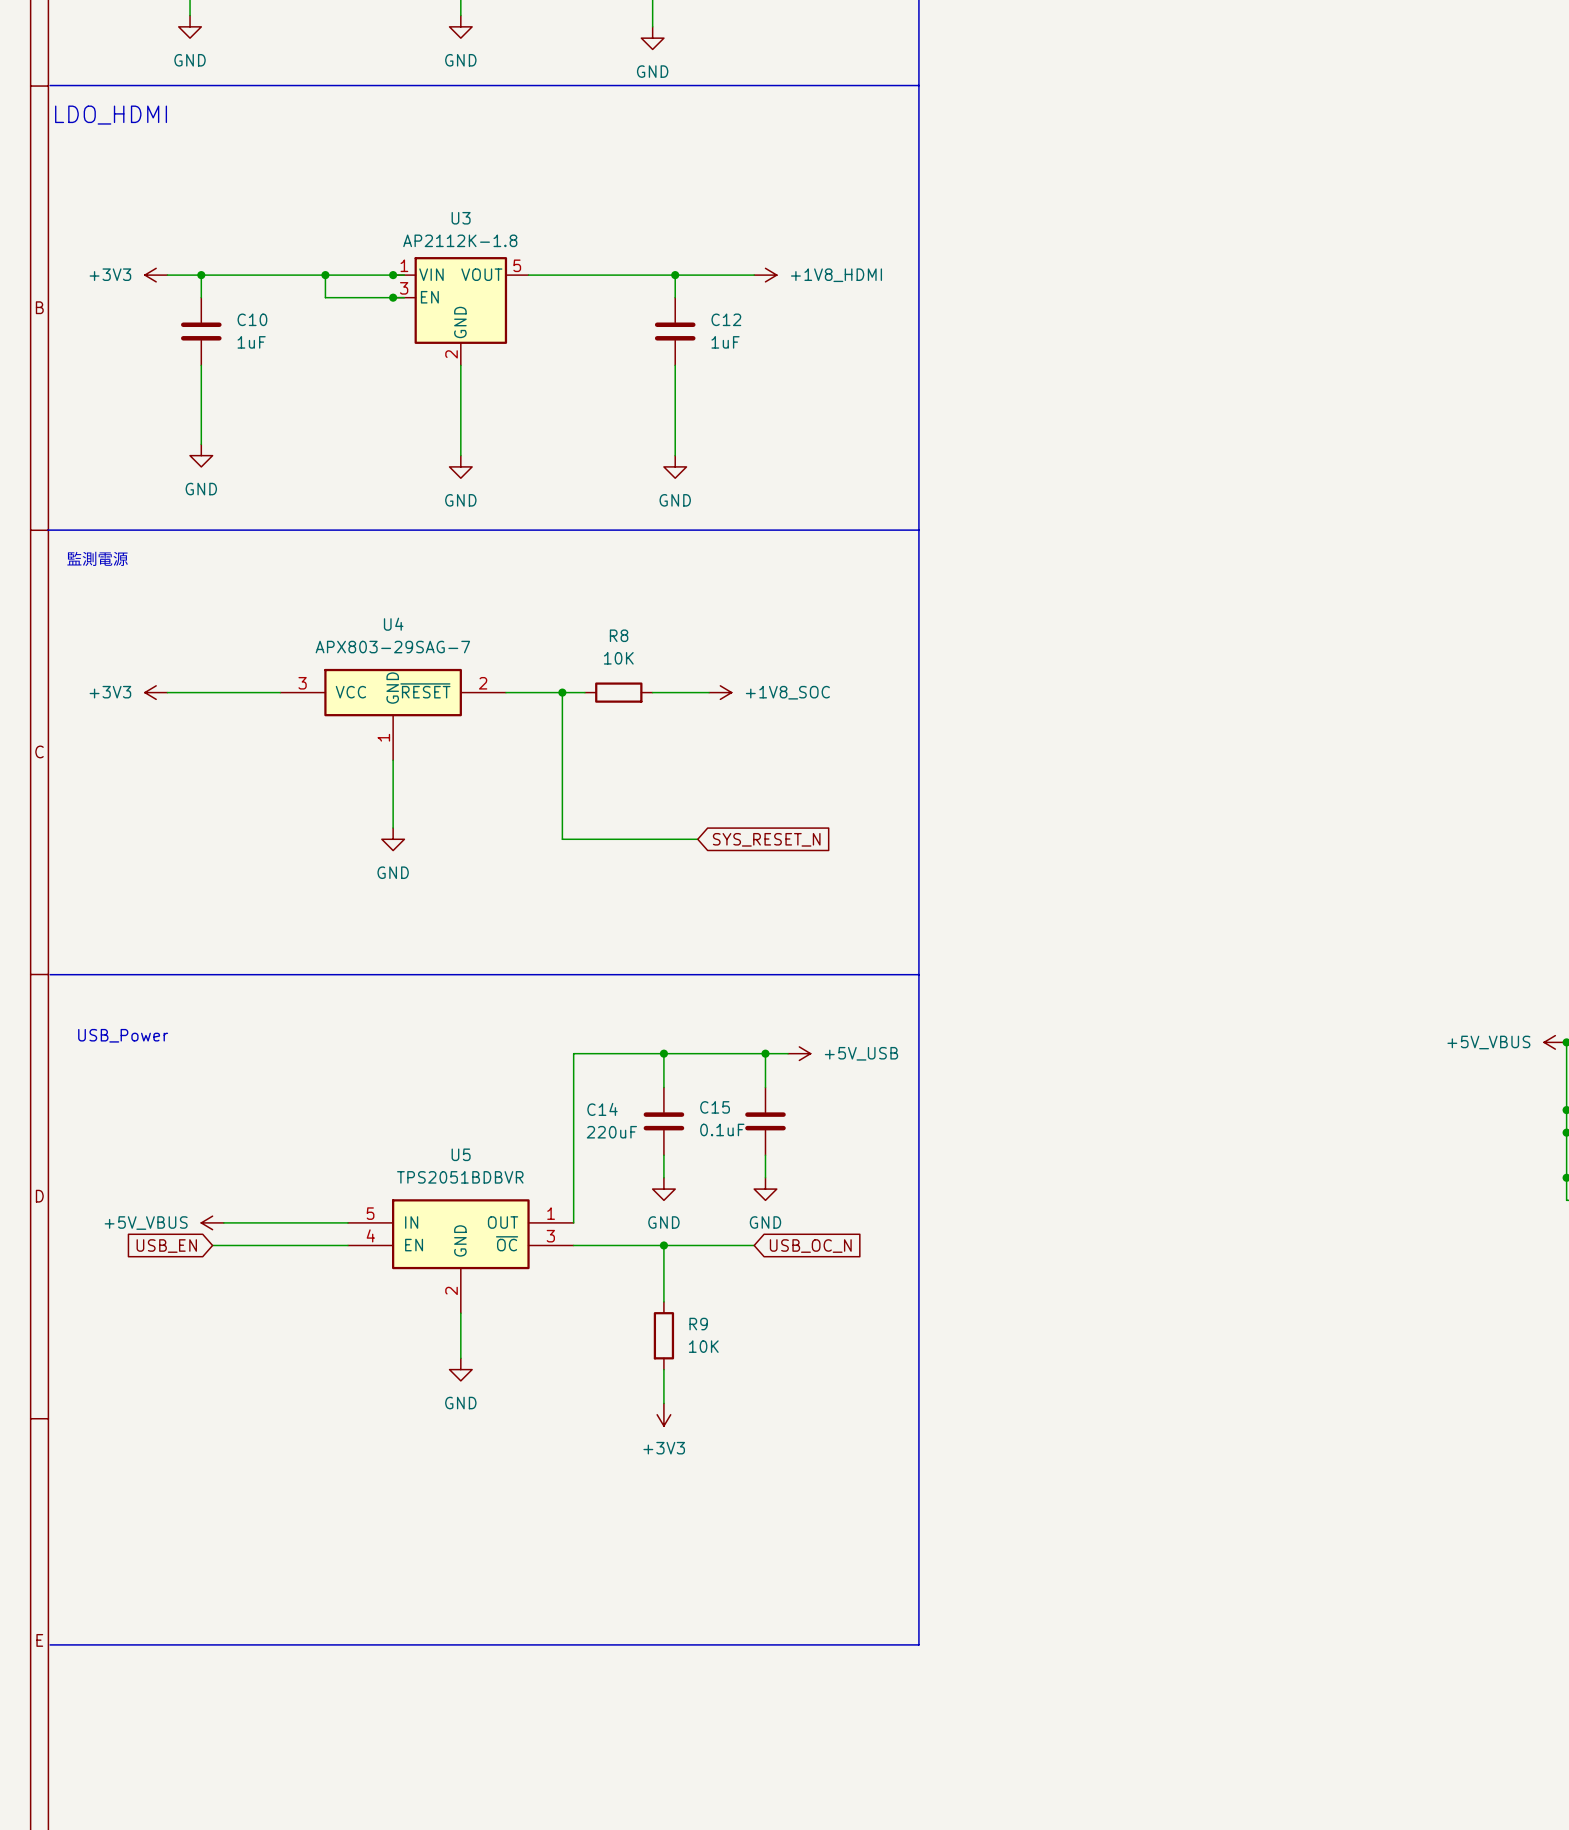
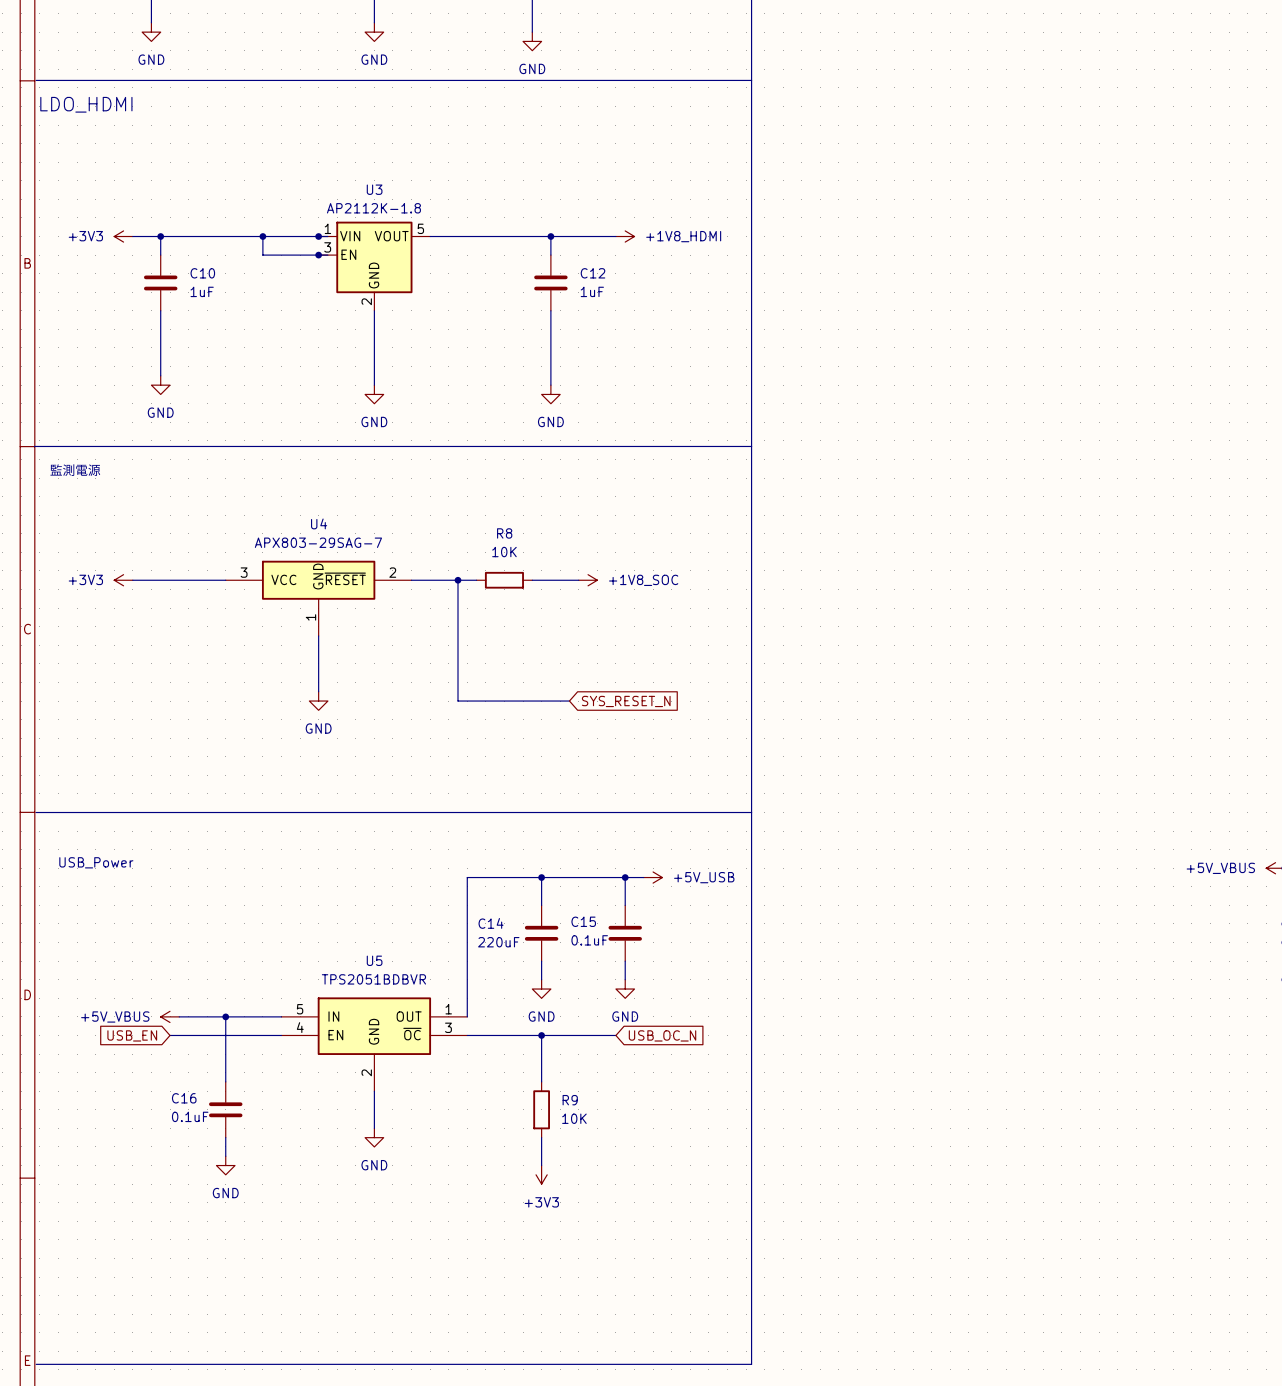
wire: none -> (225, 1016) (225, 1081)
junction: none -> (225, 1016)
C16: none -> 0.1uF (225, 1109)
wire: none -> (225, 1137) (225, 1156)
power symbol: none -> GND (225, 1165)

